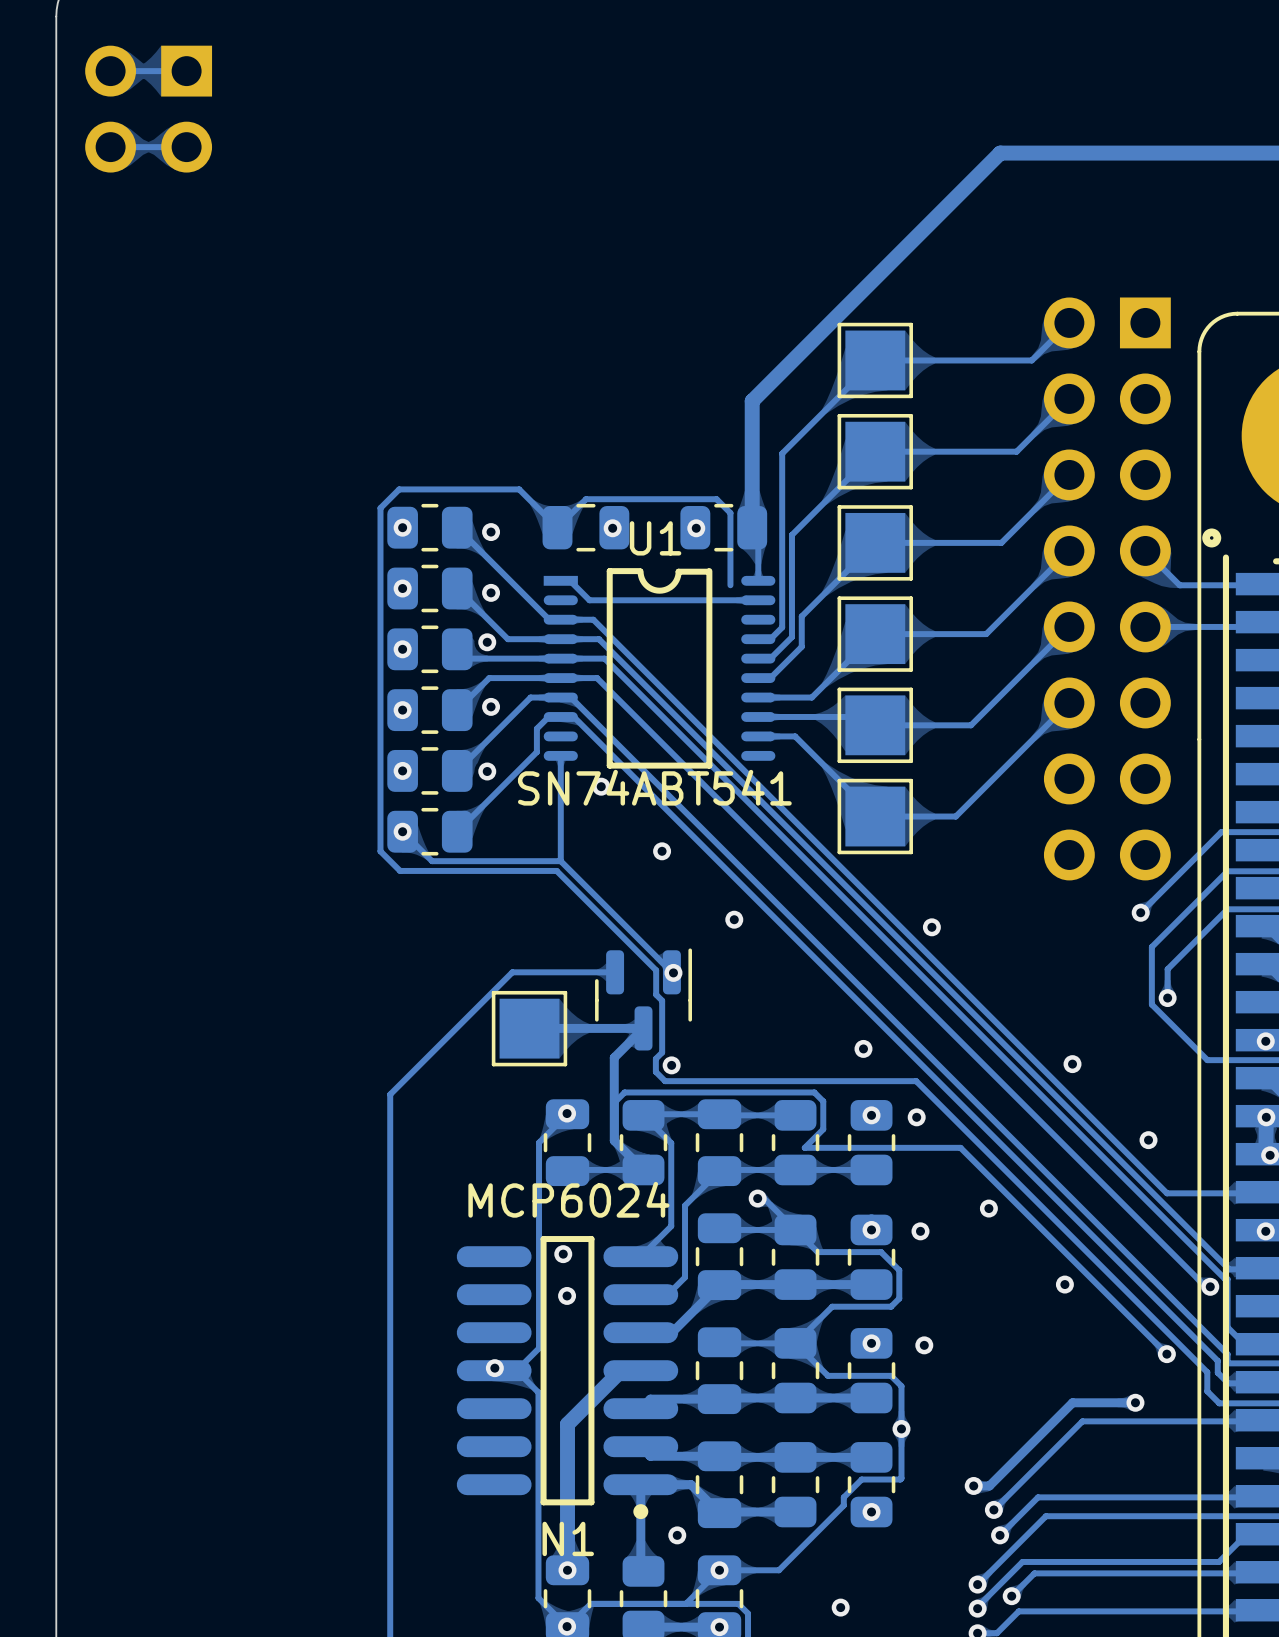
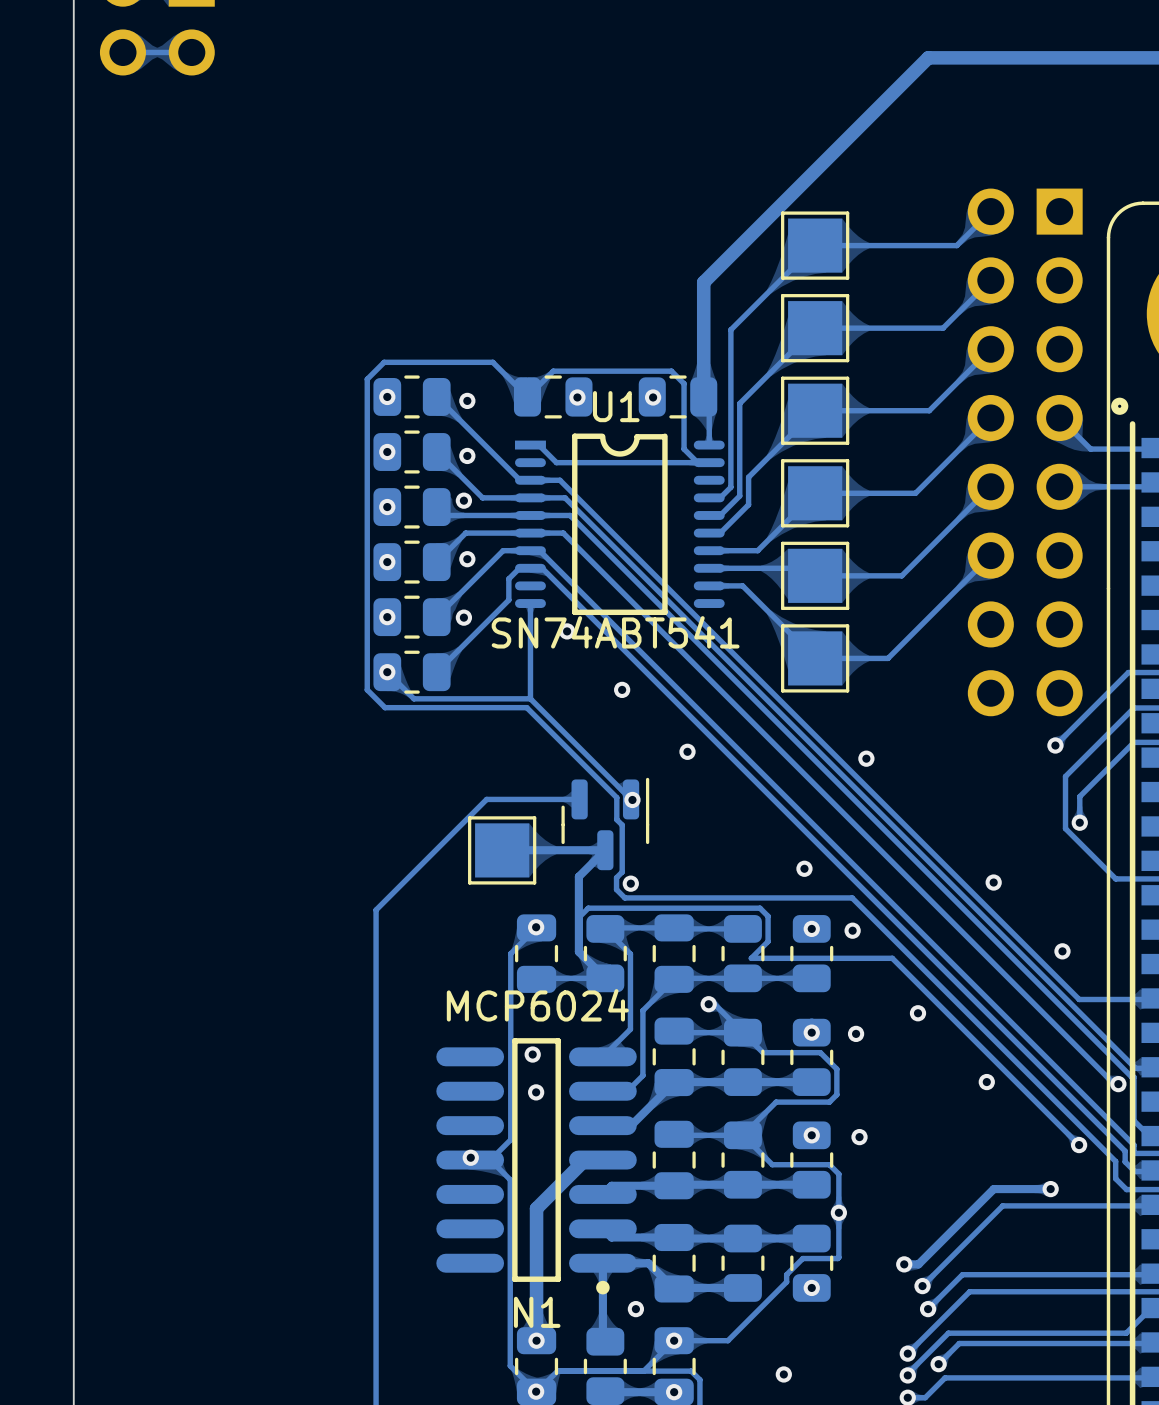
track: none -> (684, 449) (697, 462)

